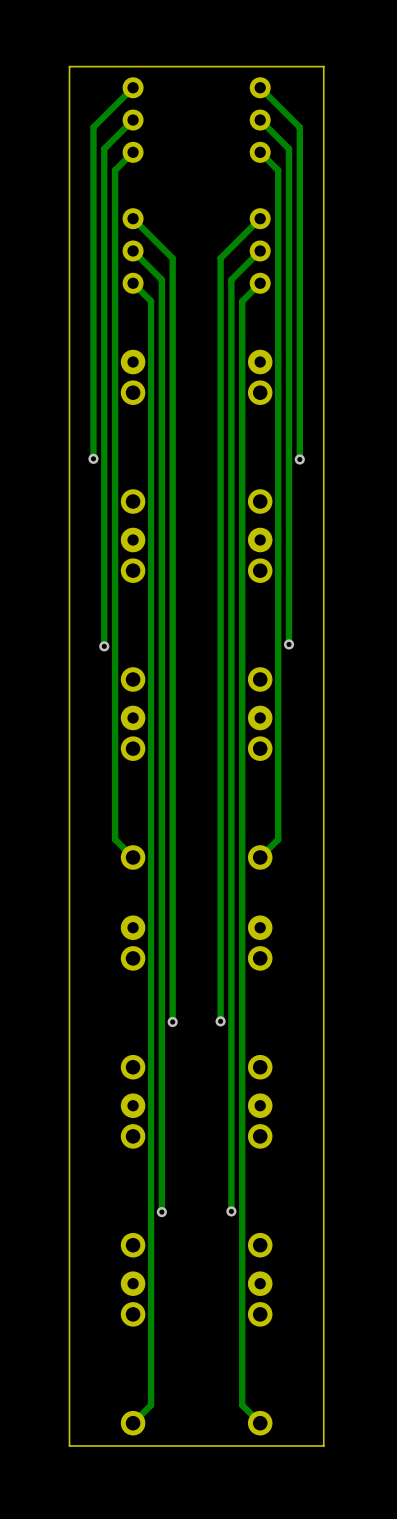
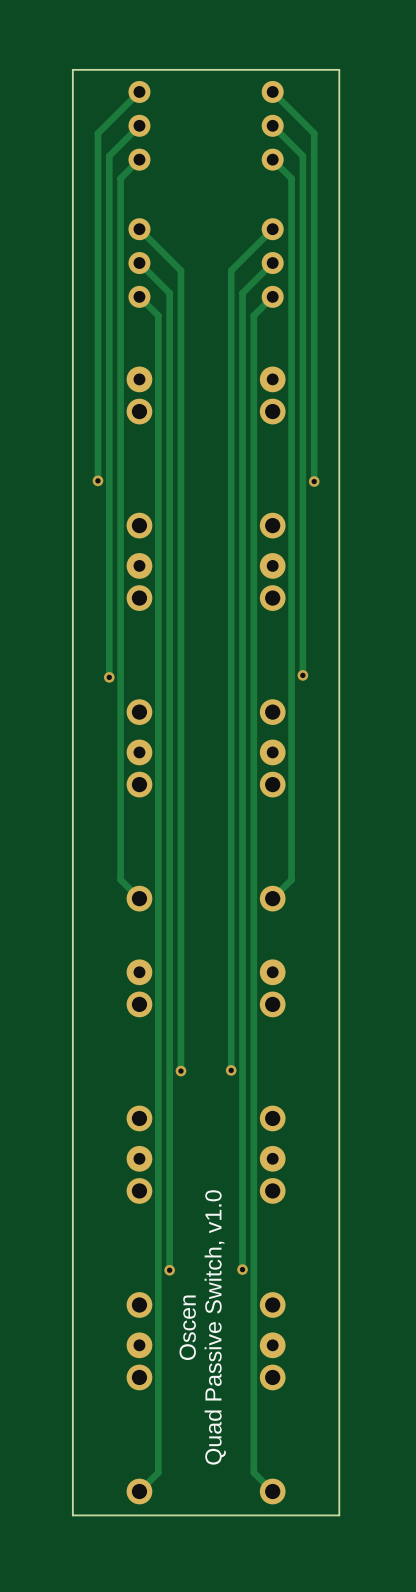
text: none -> Quad Passive Switch, v1.0 (215, 1327)
text: none -> Oscen (187, 1327)

